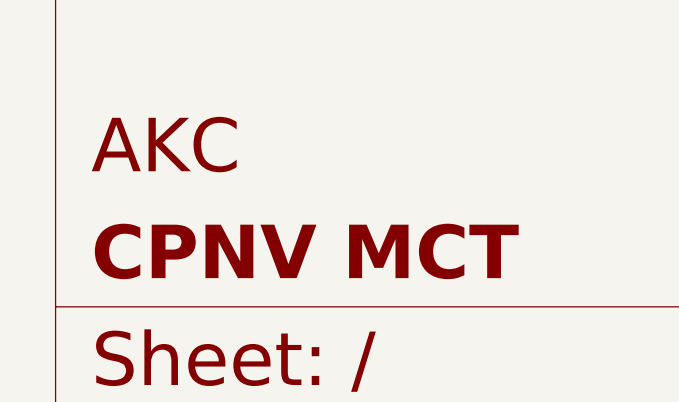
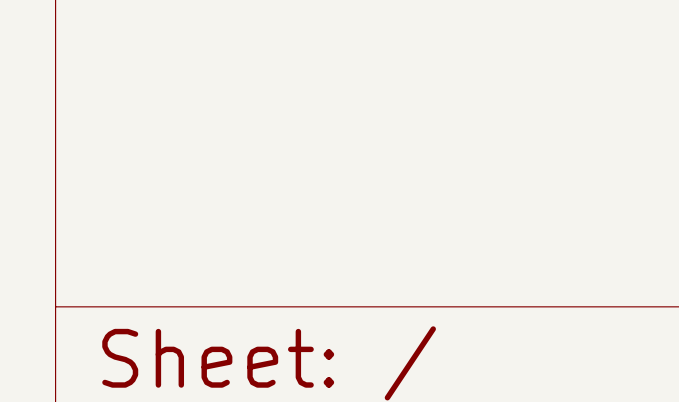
title block: AKC (164, 144) -> none
title block: CPNV MCT (306, 251) -> none

